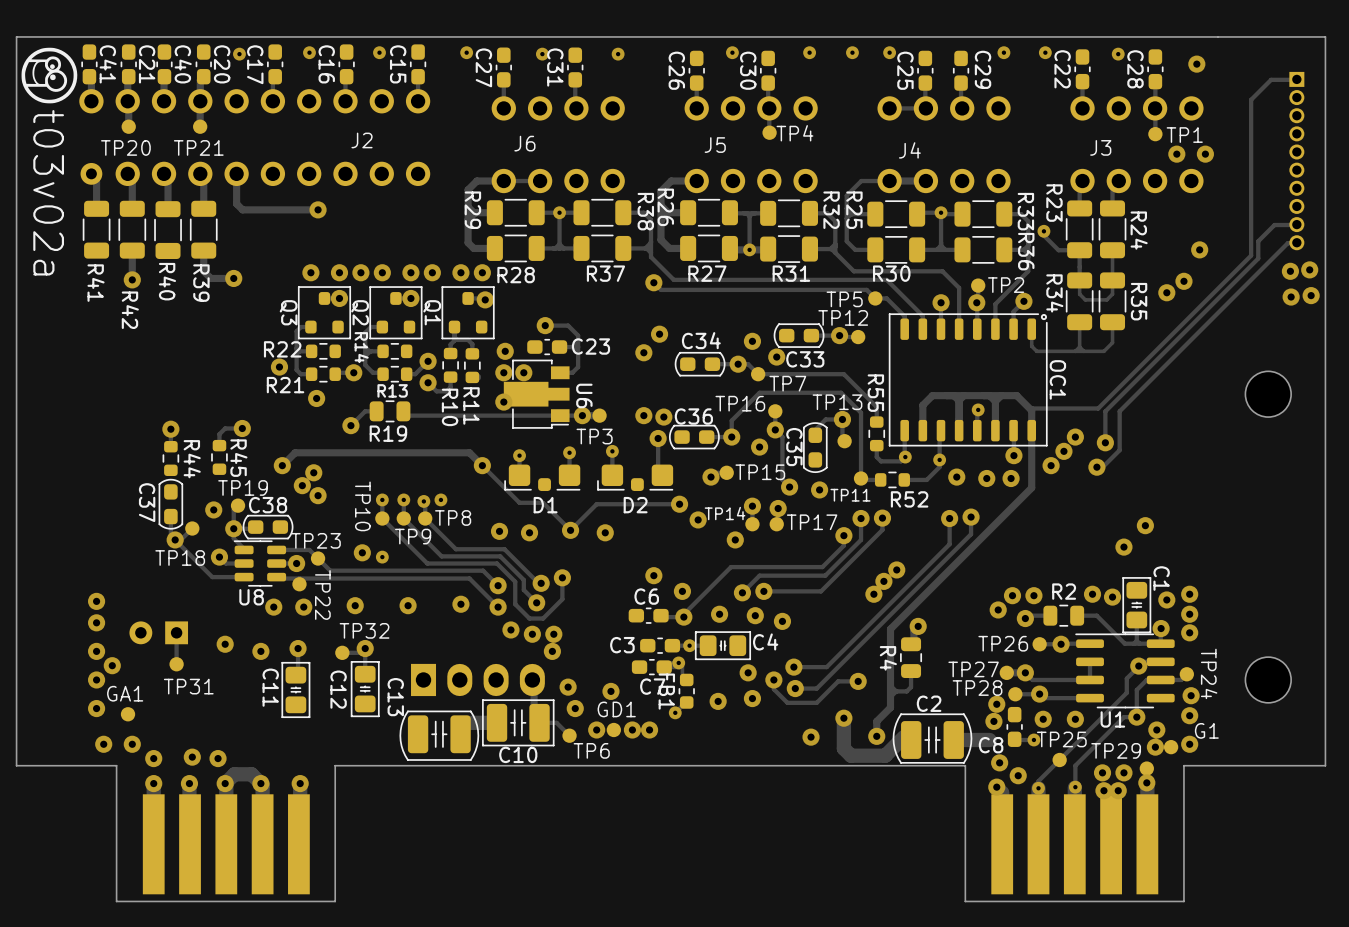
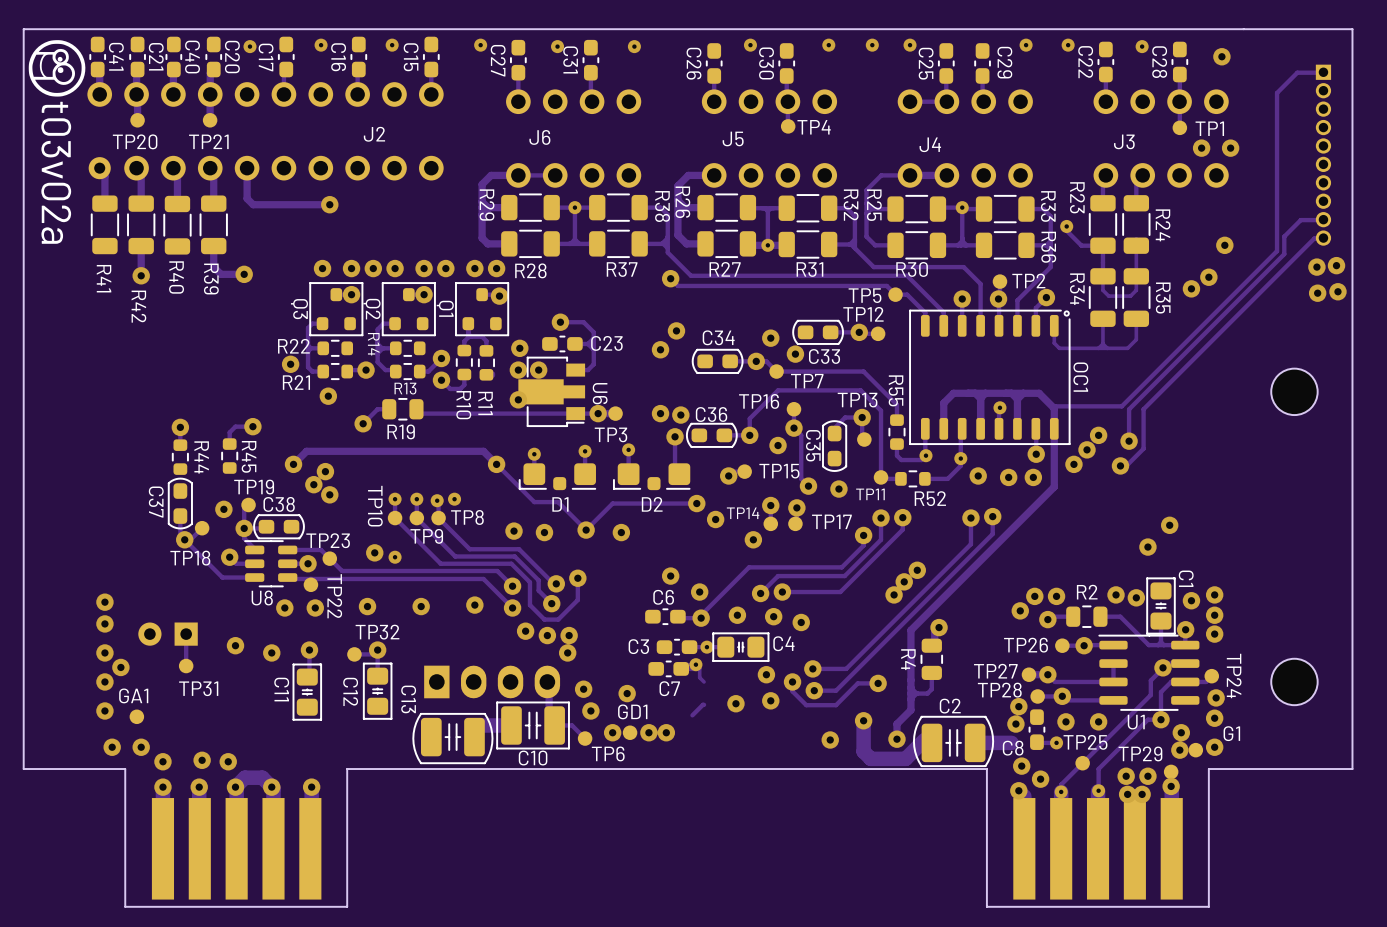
FB1: (686, 691) -> none
via: (675, 712) -> none

